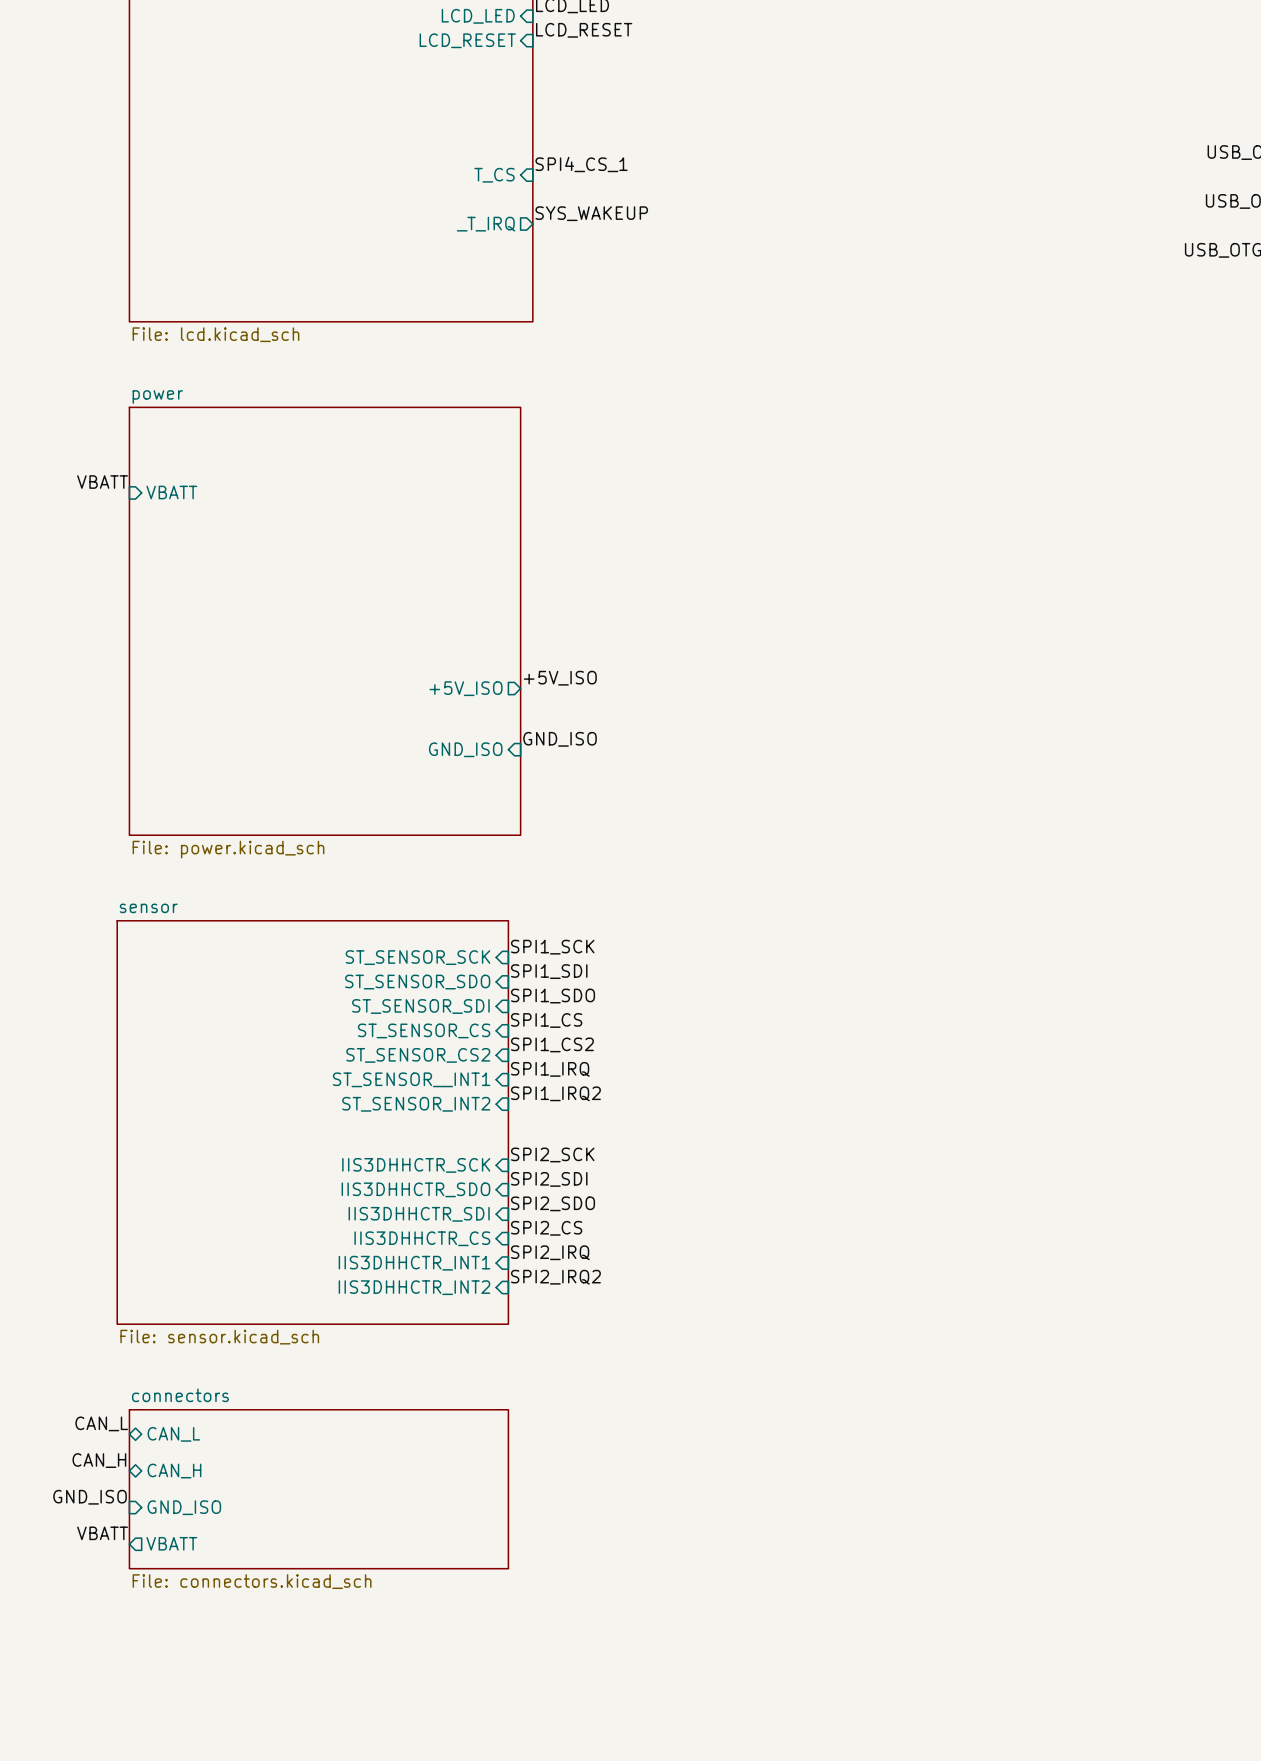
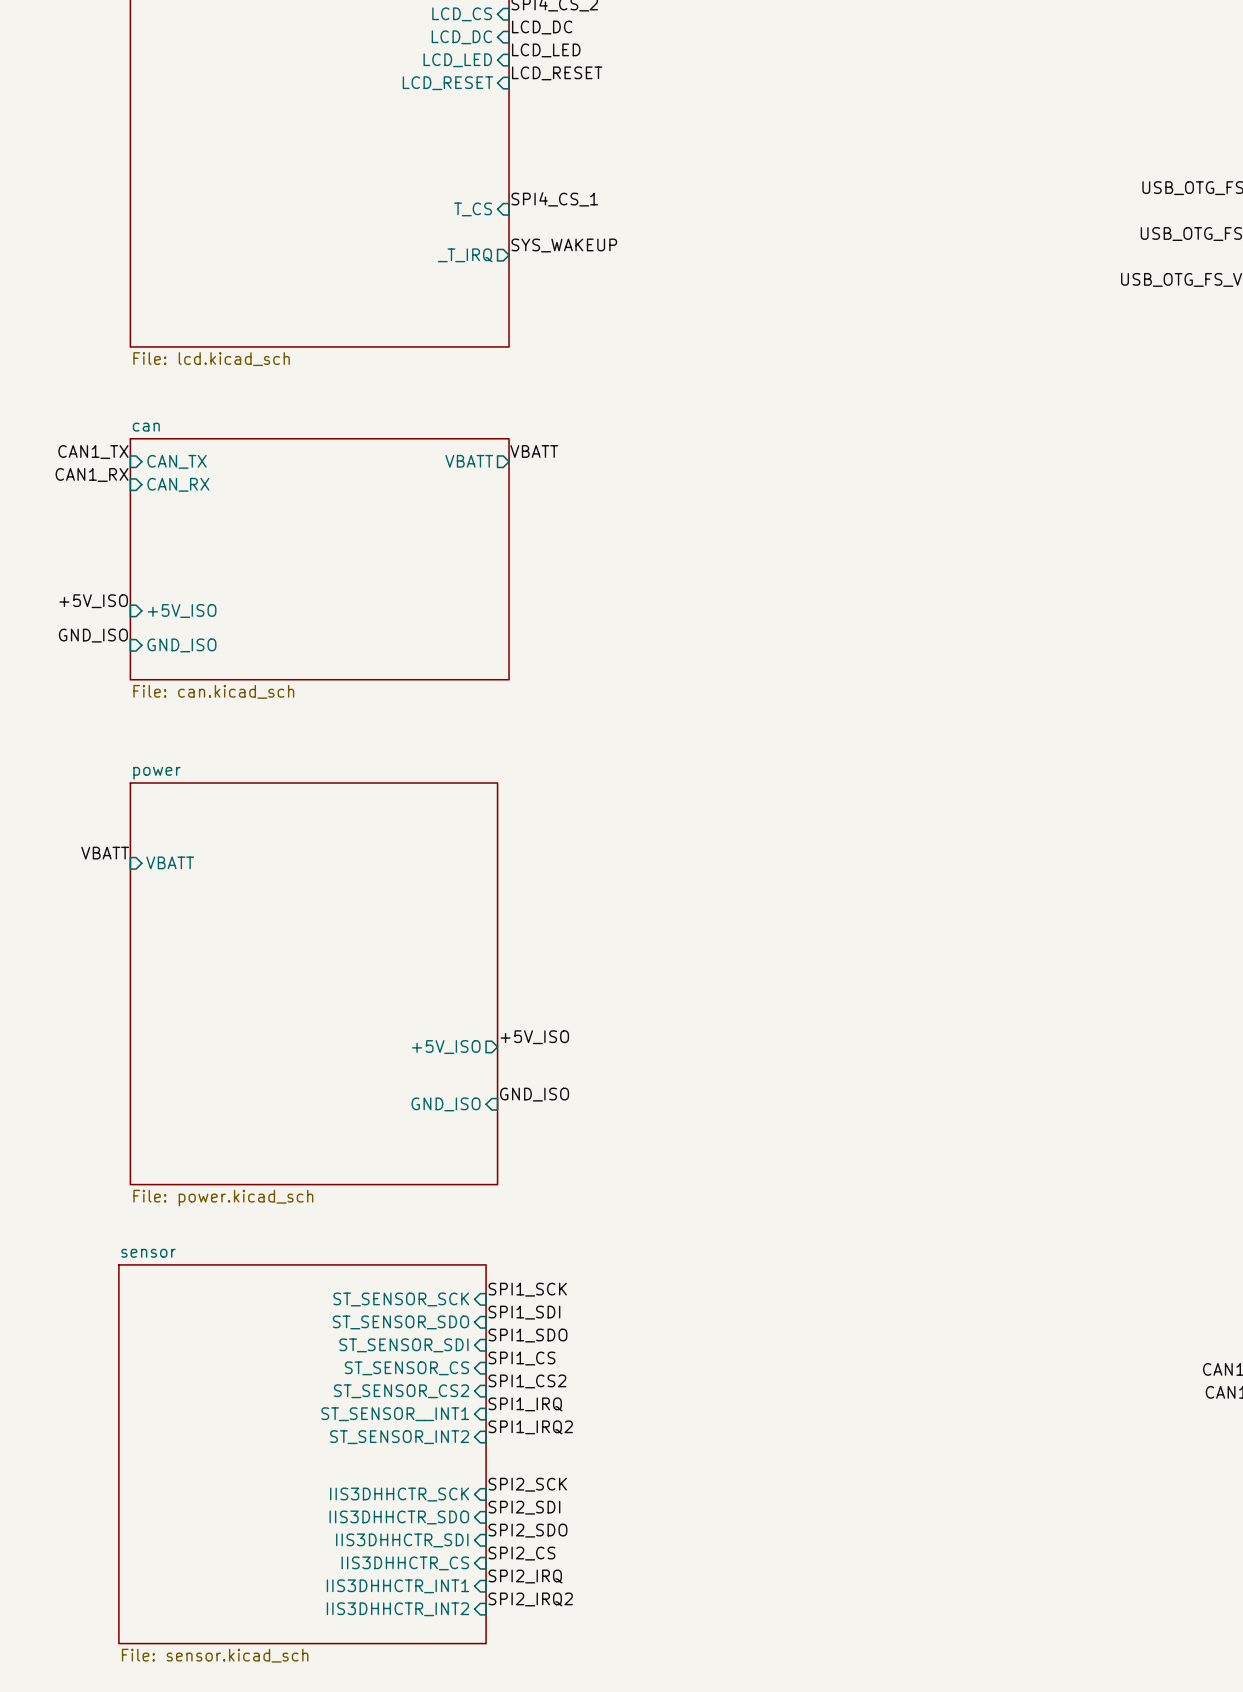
label: none -> CAN1_TX (93, 452)
label: none -> VBATT (534, 451)
sheet pin: none -> VBATT (469, 461)
sheet pin: none -> CAN_TX (177, 461)
label: none -> CAN1_RX (92, 474)
sheet pin: none -> CAN_RX (178, 484)
label: VBATT (102, 482) -> none
sheet pin: VBATT (171, 492) -> none
sheet can: none -> File: can.kicad_sch (319, 559)
label: none -> +5V_ISO (93, 601)
sheet pin: none -> +5V_ISO (182, 611)
sheet power: File: power.kicad_sch (325, 621) -> none
label: none -> GND_ISO (93, 635)
sheet pin: none -> GND_ISO (181, 645)
label: +5V_ISO (560, 678) -> none
sheet pin: +5V_ISO (466, 688) -> none
label: GND_ISO (560, 739) -> none
sheet pin: GND_ISO (465, 749) -> none
label: none -> VBATT (105, 853)
sheet pin: none -> VBATT (170, 862)
label: SPI1_SCK (552, 947) -> none
sheet pin: ST_SENSOR_SCK (417, 957) -> none
label: SPI1_SDI (549, 971) -> none
sheet pin: ST_SENSOR_SDO (417, 982) -> none
label: SPI1_SDO (553, 996) -> none
sheet power: none -> File: power.kicad_sch (313, 983)
sheet pin: ST_SENSOR_SDI (420, 1006) -> none
label: SPI1_CS (546, 1020) -> none
sheet pin: ST_SENSOR_CS (424, 1030) -> none
label: SPI1_CS2 (552, 1044) -> none
sheet pin: ST_SENSOR_CS2 (418, 1055) -> none
label: none -> +5V_ISO (534, 1037)
sheet pin: none -> +5V_ISO (446, 1047)
label: SPI1_IRQ (550, 1069) -> none
sheet pin: ST_SENSOR__INT1 (411, 1079) -> none
label: SPI1_IRQ2 (555, 1093) -> none
sheet pin: ST_SENSOR_INT2 (416, 1104) -> none
label: none -> GND_ISO (534, 1094)
sheet sensor: File: sensor.kicad_sch (312, 1122) -> none
sheet pin: none -> GND_ISO (446, 1104)
label: SPI2_SCK (552, 1154) -> none
sheet pin: IIS3DHHCTR_SCK (416, 1165) -> none
label: SPI2_SDI (549, 1179) -> none
sheet pin: IIS3DHHCTR_SDO (415, 1189) -> none
label: SPI2_SDO (553, 1203) -> none
sheet pin: IIS3DHHCTR_SDI (419, 1214) -> none
label: SPI2_CS (546, 1228) -> none
sheet pin: IIS3DHHCTR_CS (422, 1238) -> none
label: SPI2_IRQ (550, 1252) -> none
sheet pin: IIS3DHHCTR_INT1 (414, 1263) -> none
label: SPI2_IRQ2 (555, 1277) -> none
sheet pin: IIS3DHHCTR_INT2 (414, 1287) -> none
label: none -> SPI1_SCK (527, 1289)
sheet pin: none -> ST_SENSOR_SCK (401, 1299)
label: none -> SPI1_SDI (524, 1312)
sheet pin: none -> ST_SENSOR_SDO (400, 1322)
label: none -> SPI1_SDO (527, 1335)
sheet pin: none -> ST_SENSOR_SDI (403, 1345)
label: none -> SPI1_CS (521, 1358)
sheet pin: none -> ST_SENSOR_CS (406, 1368)
label: CAN_L (101, 1423) -> none
label: none -> SPI1_CS2 (527, 1381)
sheet pin: CAN_L (173, 1434) -> none
sheet pin: none -> ST_SENSOR_CS2 (401, 1391)
label: none -> SPI1_IRQ (525, 1404)
sheet pin: none -> ST_SENSOR__INT1 (395, 1414)
label: CAN_H (99, 1460) -> none
sheet pin: CAN_H (174, 1471) -> none
label: none -> SPI1_IRQ2 (530, 1427)
sheet pin: none -> ST_SENSOR_INT2 (399, 1437)
sheet connectors: File: connectors.kicad_sch (318, 1489) -> none
label: GND_ISO (90, 1497) -> none
sheet sensor: none -> File: sensor.kicad_sch (302, 1454)
sheet pin: GND_ISO (184, 1507) -> none
label: VBATT (102, 1533) -> none
label: none -> SPI2_SCK (527, 1484)
sheet pin: VBATT (171, 1543) -> none
sheet pin: none -> IIS3DHHCTR_SCK (399, 1494)
label: none -> SPI2_SDI (524, 1507)
sheet pin: none -> IIS3DHHCTR_SDO (399, 1517)
label: none -> SPI2_SDO (527, 1530)
sheet pin: none -> IIS3DHHCTR_SDI (402, 1540)
label: none -> SPI2_CS (521, 1553)
sheet pin: none -> IIS3DHHCTR_CS (405, 1563)
label: none -> SPI2_IRQ (525, 1576)
sheet pin: none -> IIS3DHHCTR_INT1 (397, 1586)
label: none -> SPI2_IRQ2 (530, 1599)
sheet pin: none -> IIS3DHHCTR_INT2 (397, 1609)

